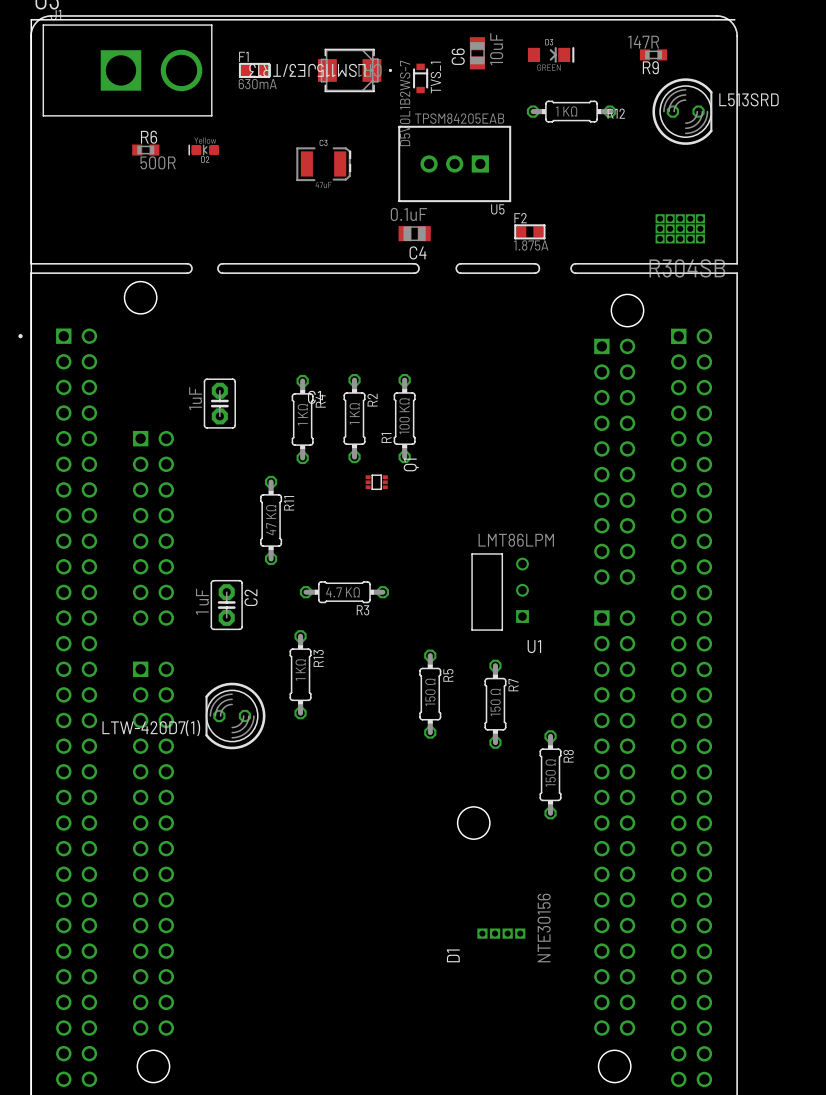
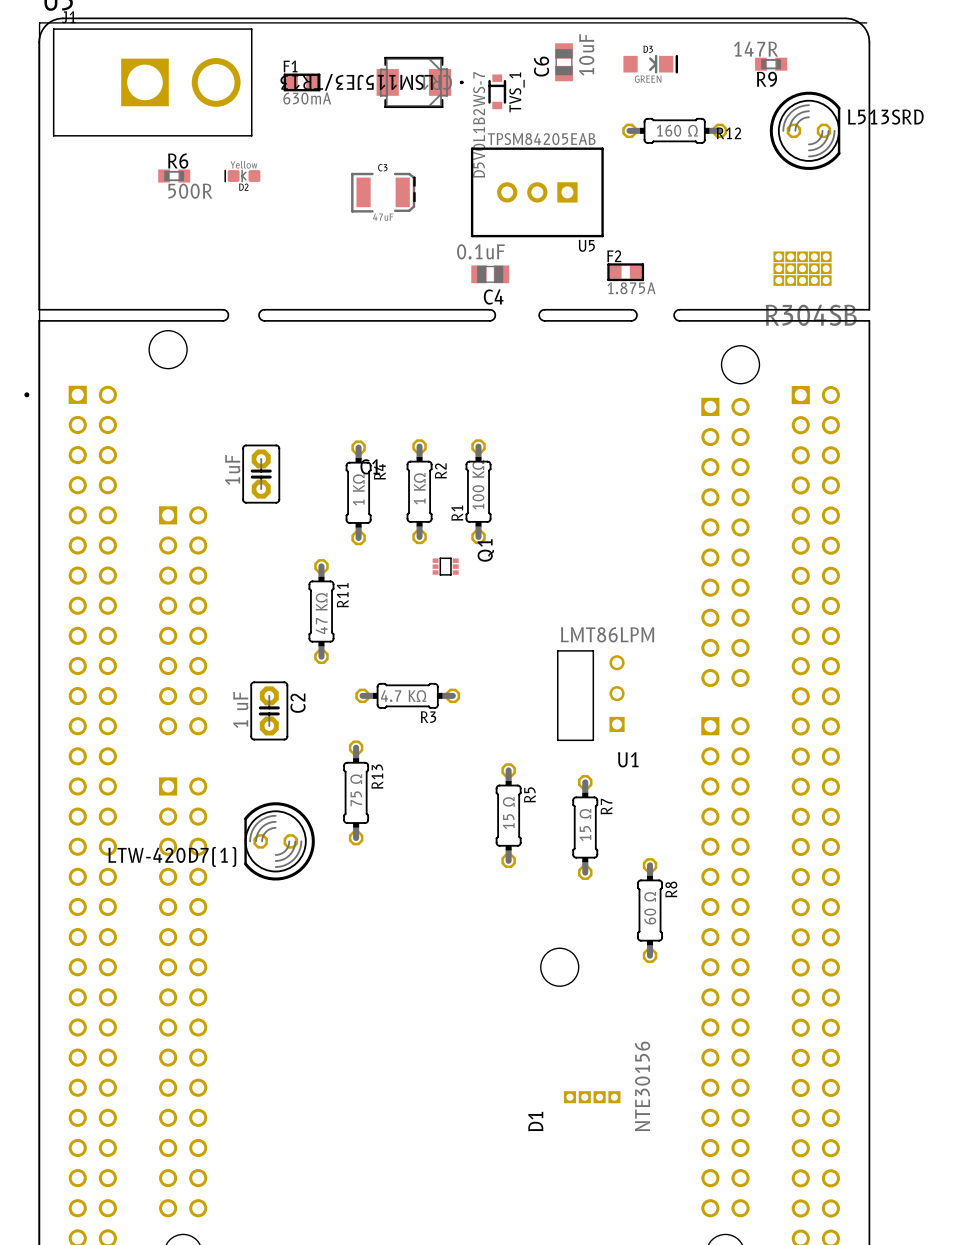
R12 value: 1 KΩ (566, 111) -> 160 Ω (677, 130)
R13 value: 1 KΩ (300, 670) -> 75 Ω (356, 790)
R5 value: 150 Ω (430, 692) -> 15 Ω (508, 813)
R7 value: 150 Ω (495, 702) -> 15 Ω (585, 824)
R8 value: 150 Ω (550, 773) -> 60 Ω (650, 908)

